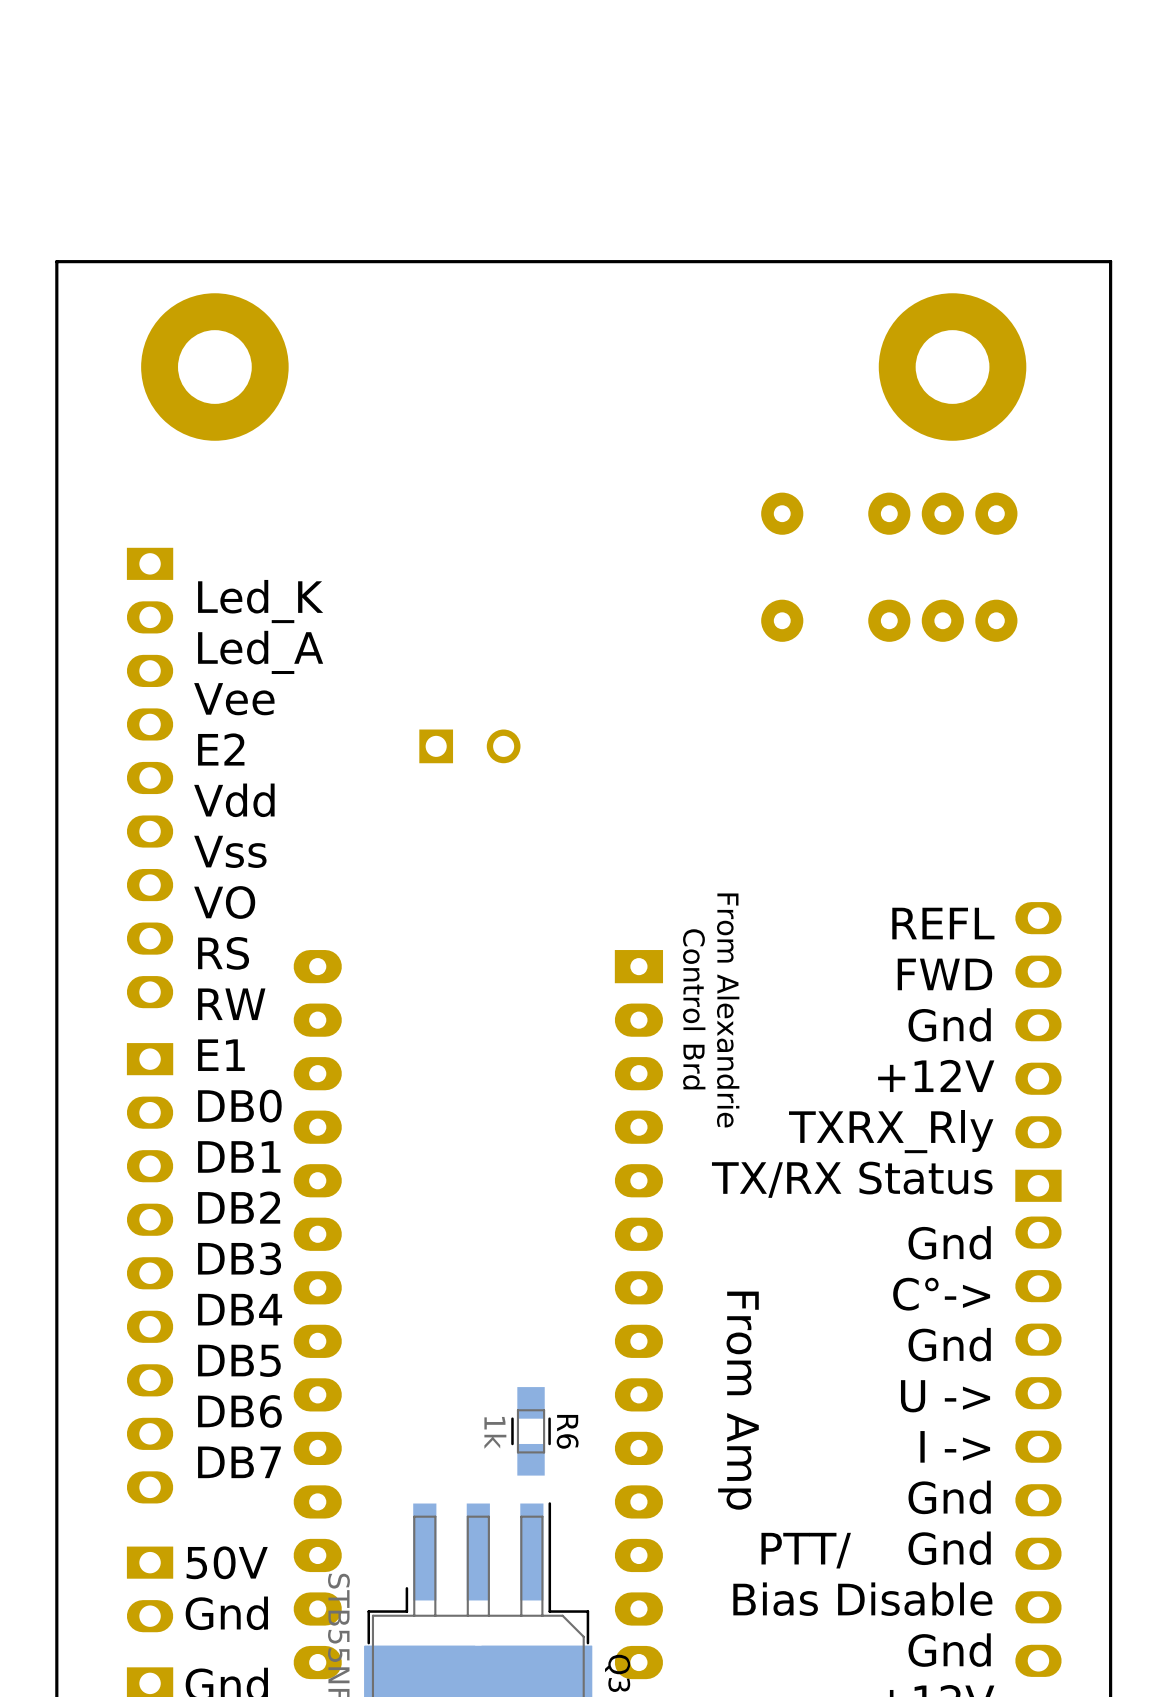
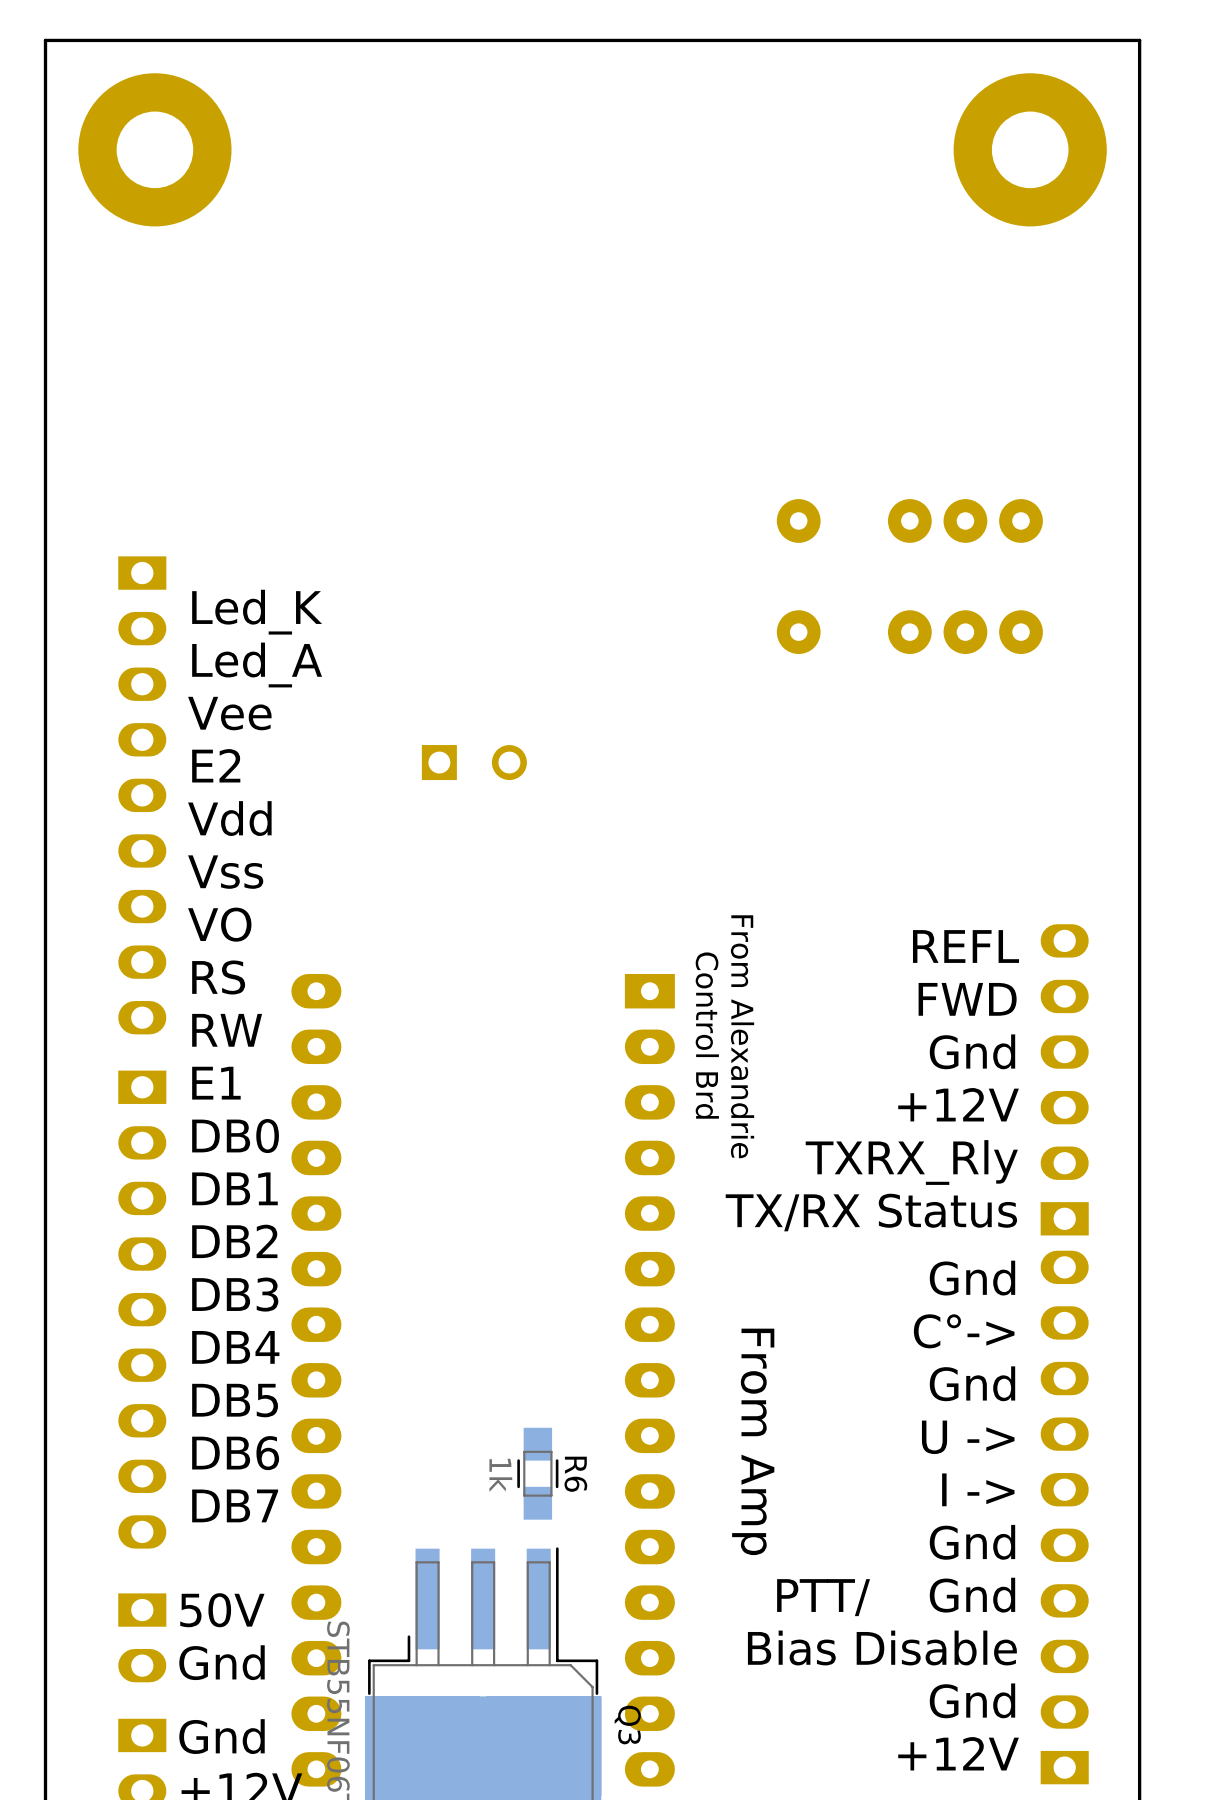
board edge: (1110, 261) (56, 261) -> (1139, 259) (1139, 40) (45, 40) (45, 259)
part position: (214, 367) -> (154, 149)
part position: (952, 367) -> (1030, 149)

